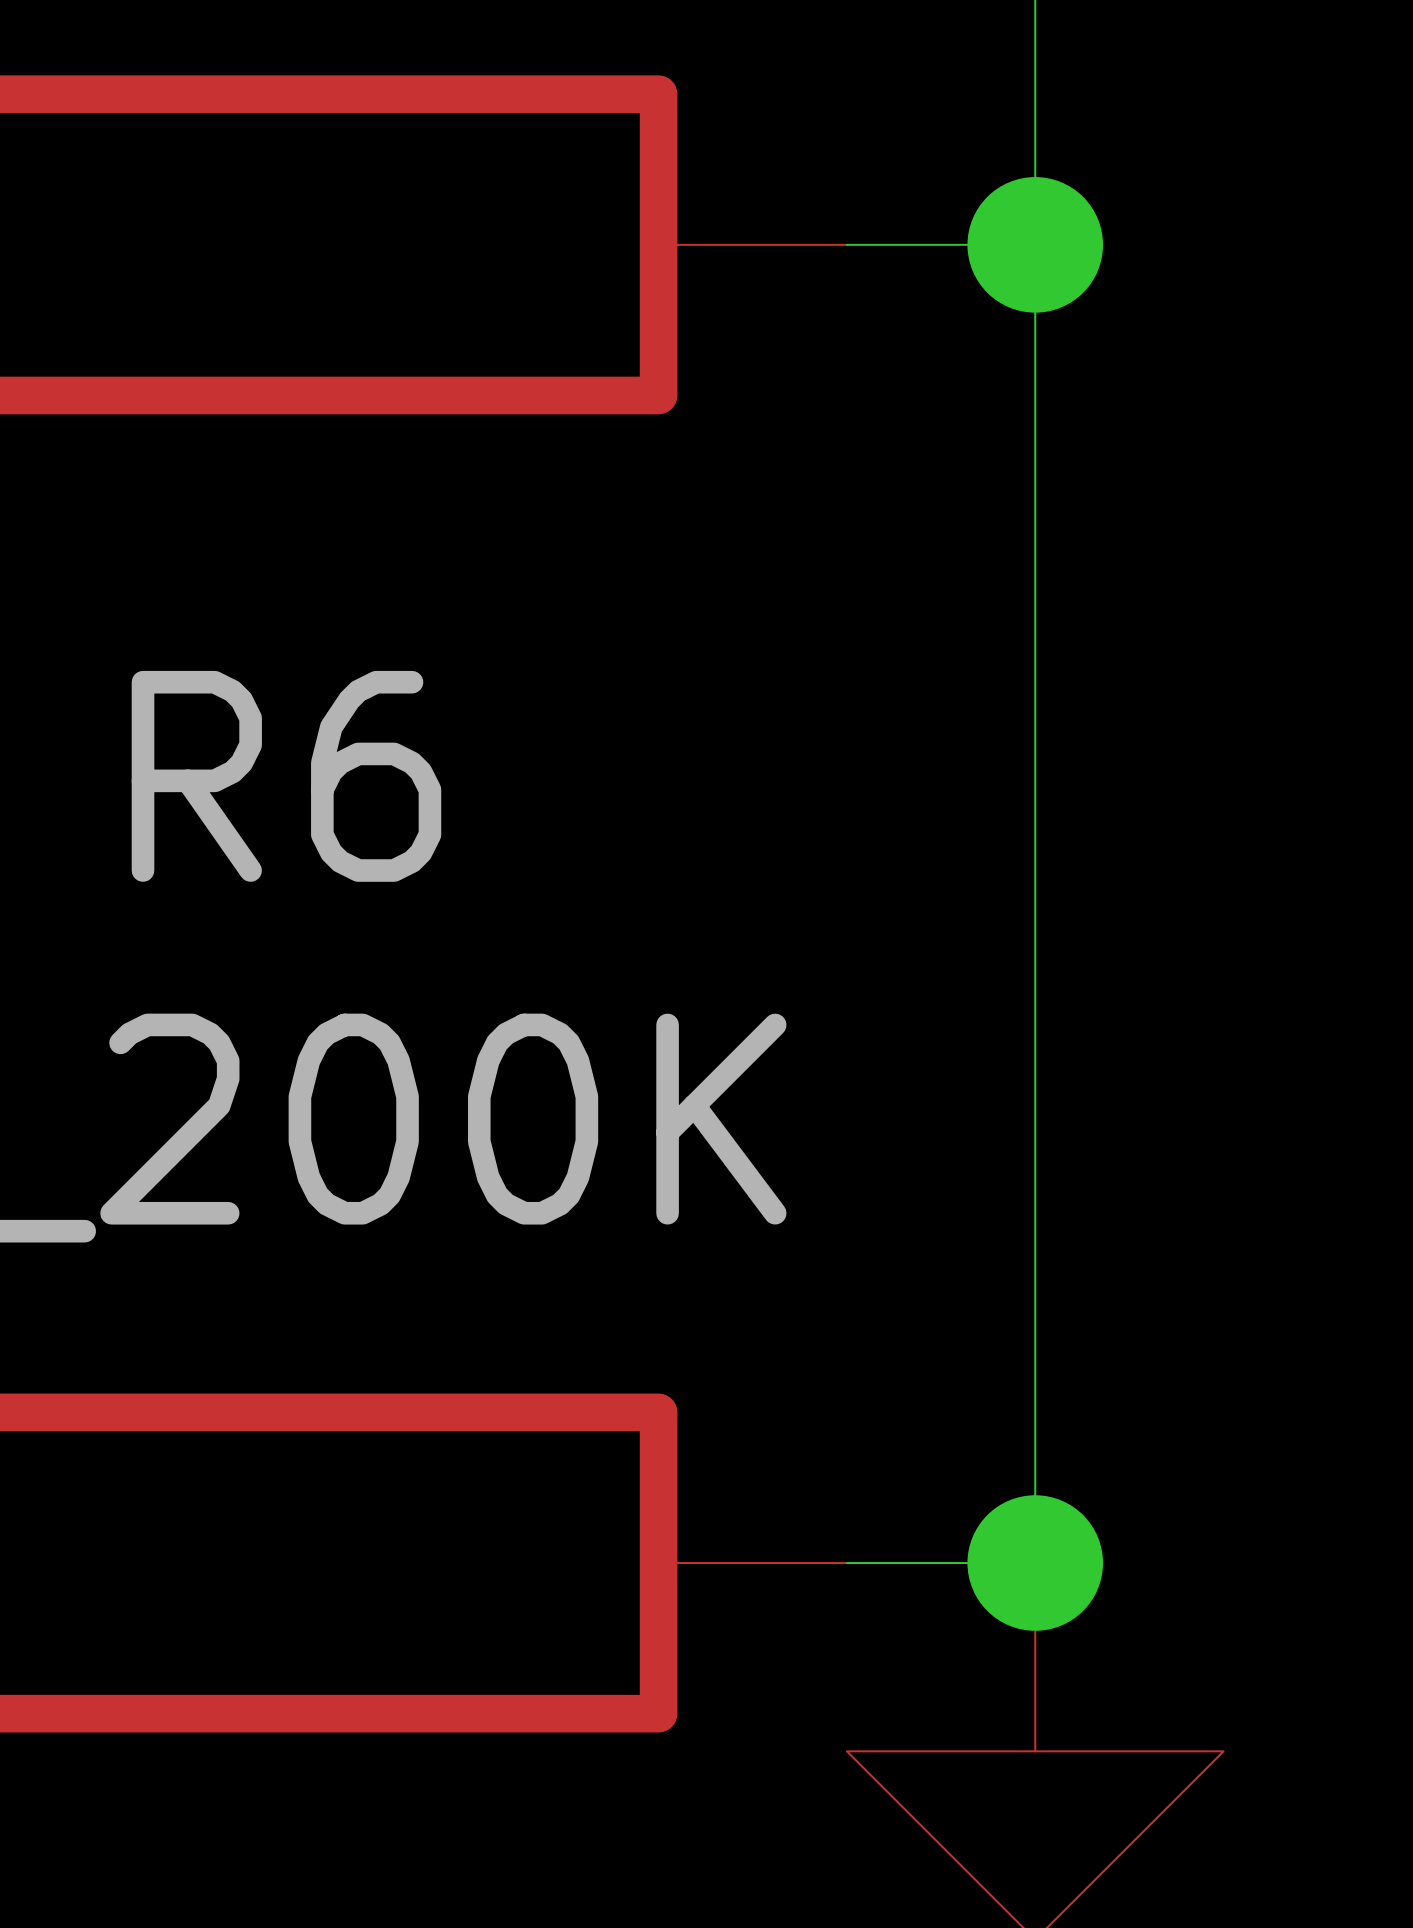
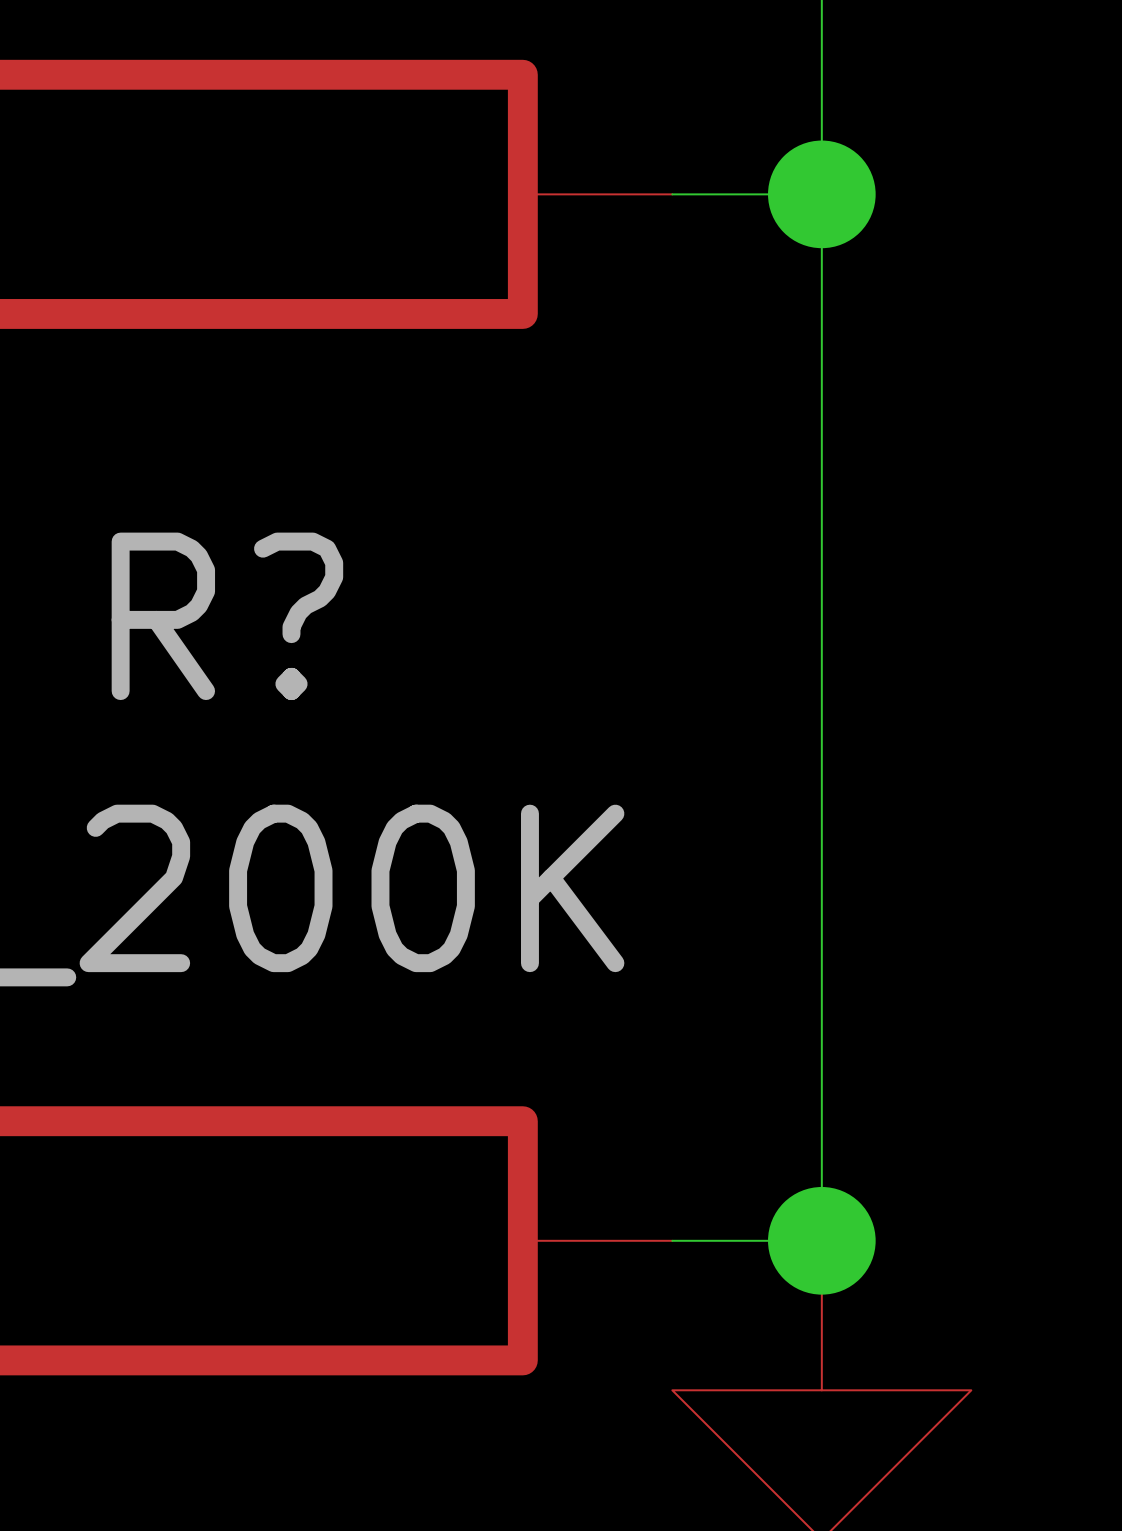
R6 name: R6 (286, 776) -> R? (227, 616)

